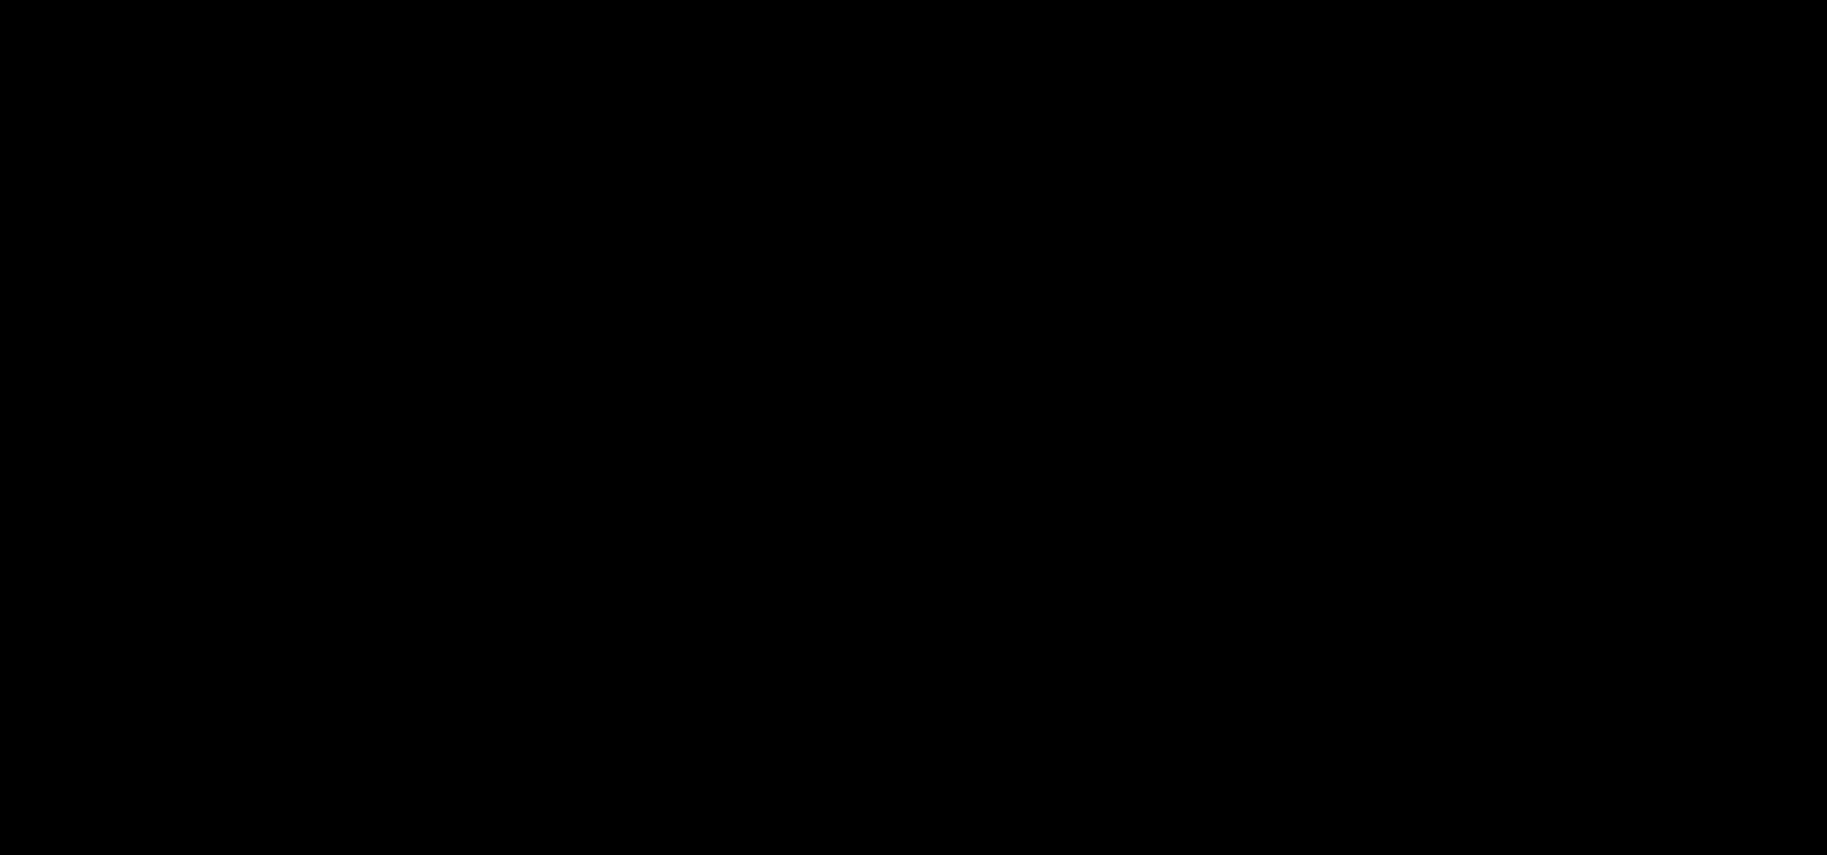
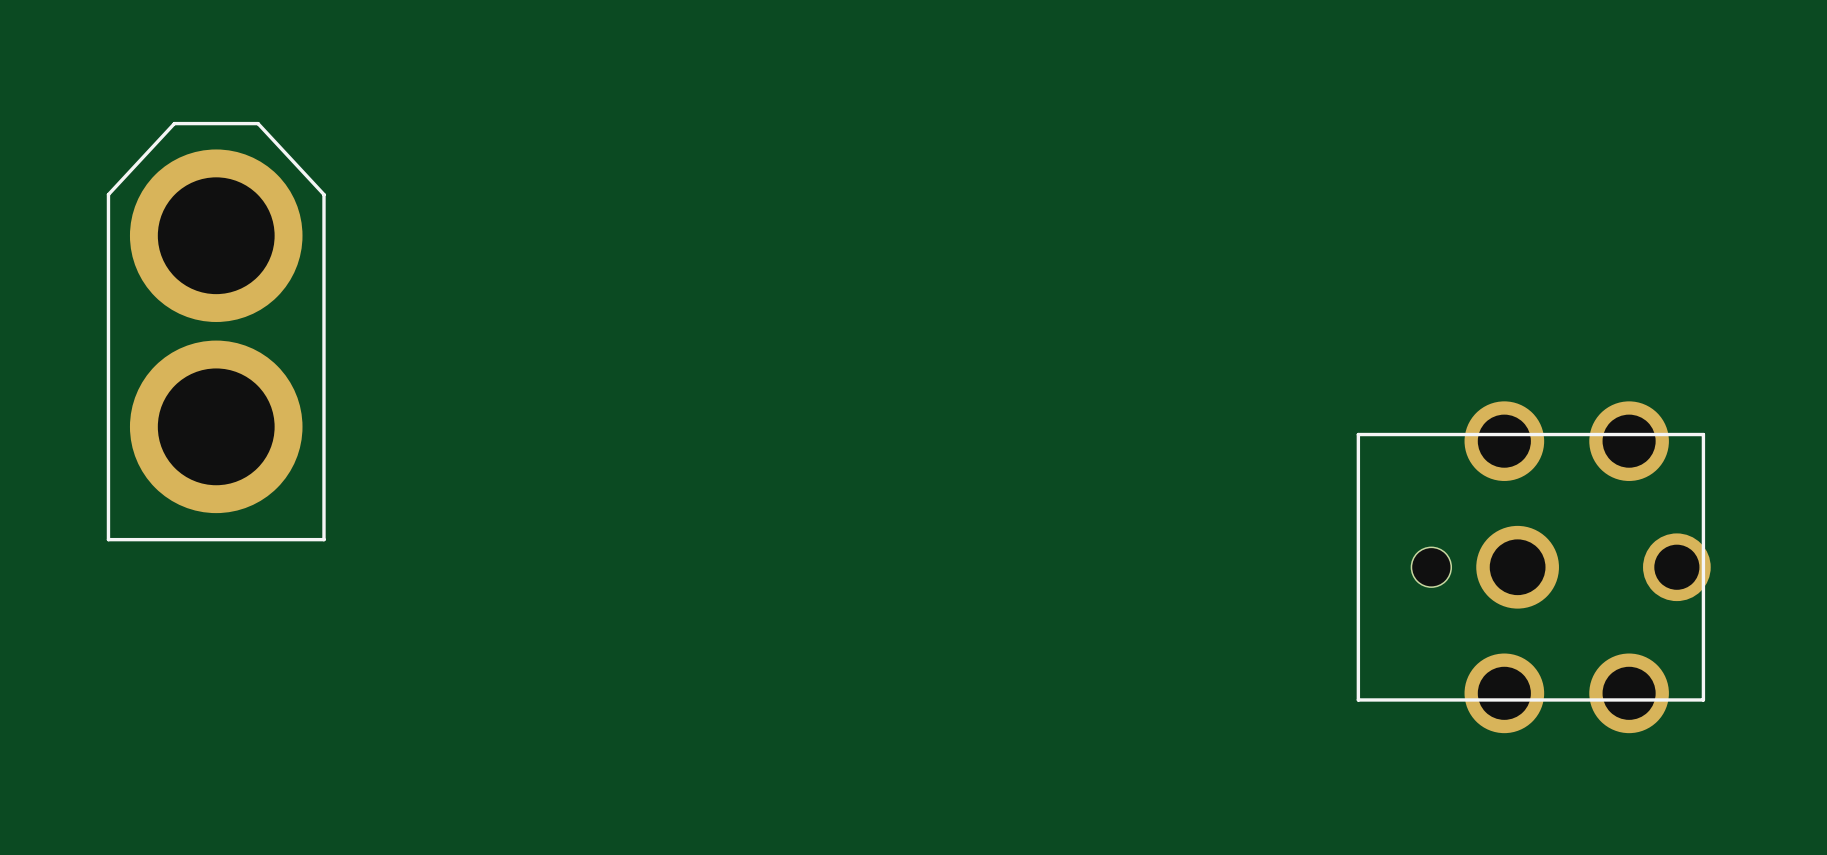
part: none -> (216, 331)
part: none -> (1533, 567)

